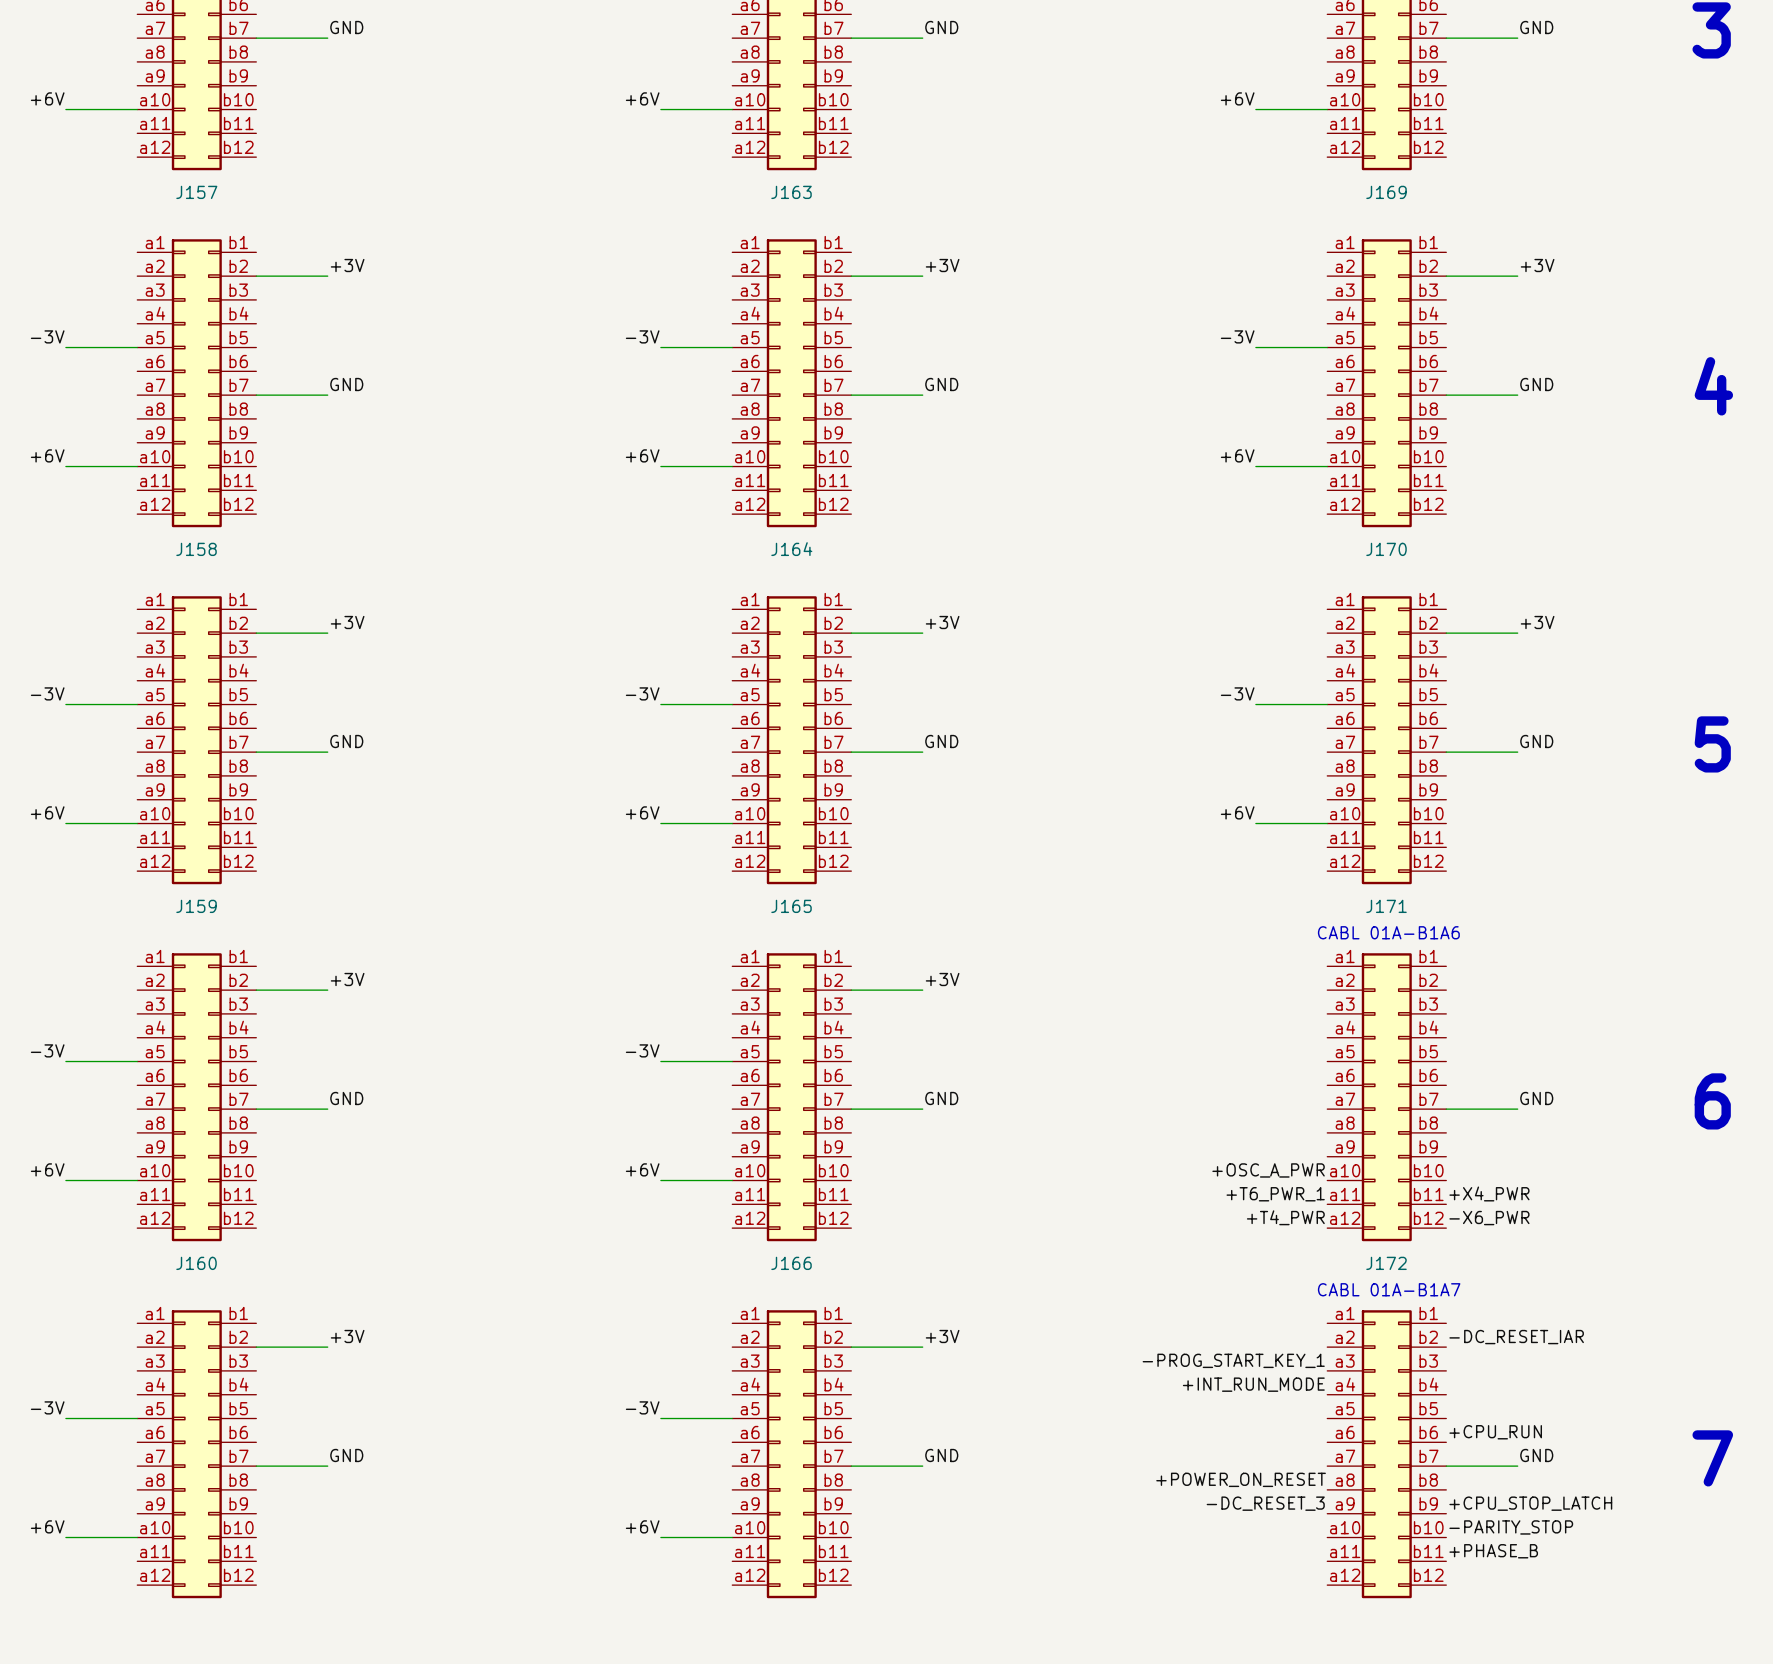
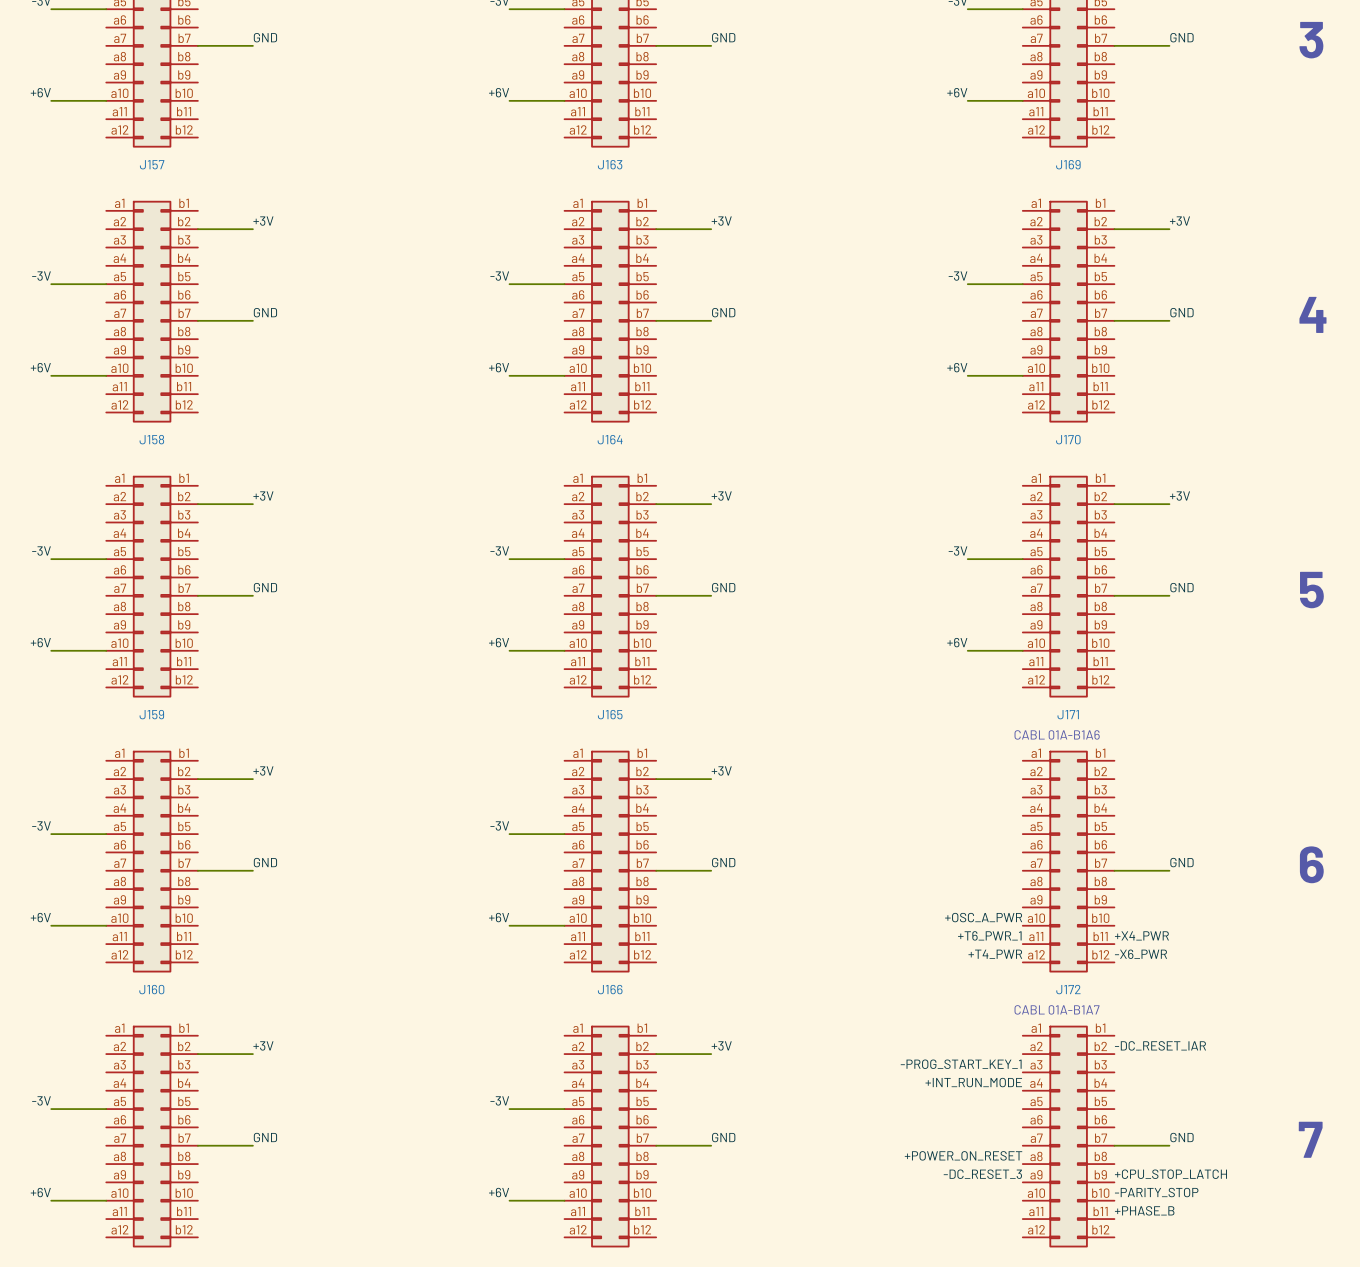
label: +CPU_RUN (1495, 1432) -> none

